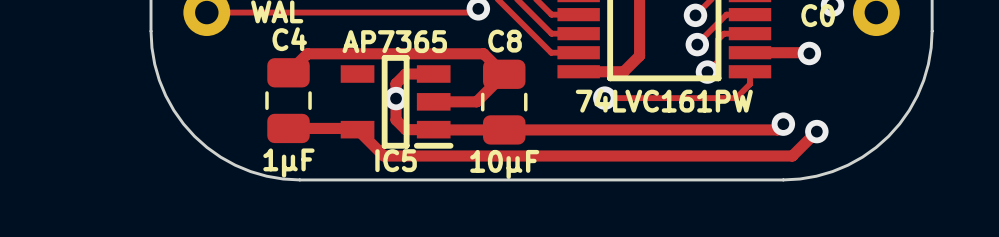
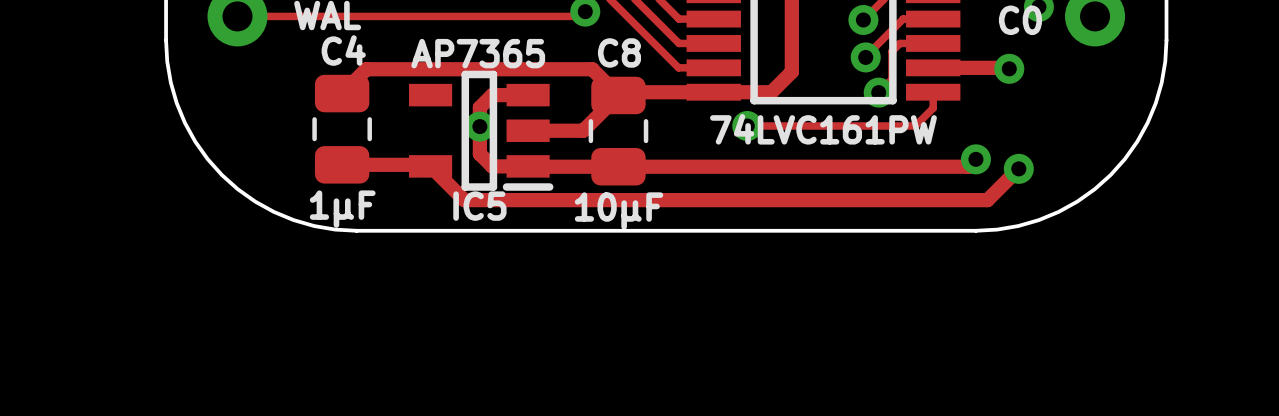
track: none -> (621, 92) (713, 92)

